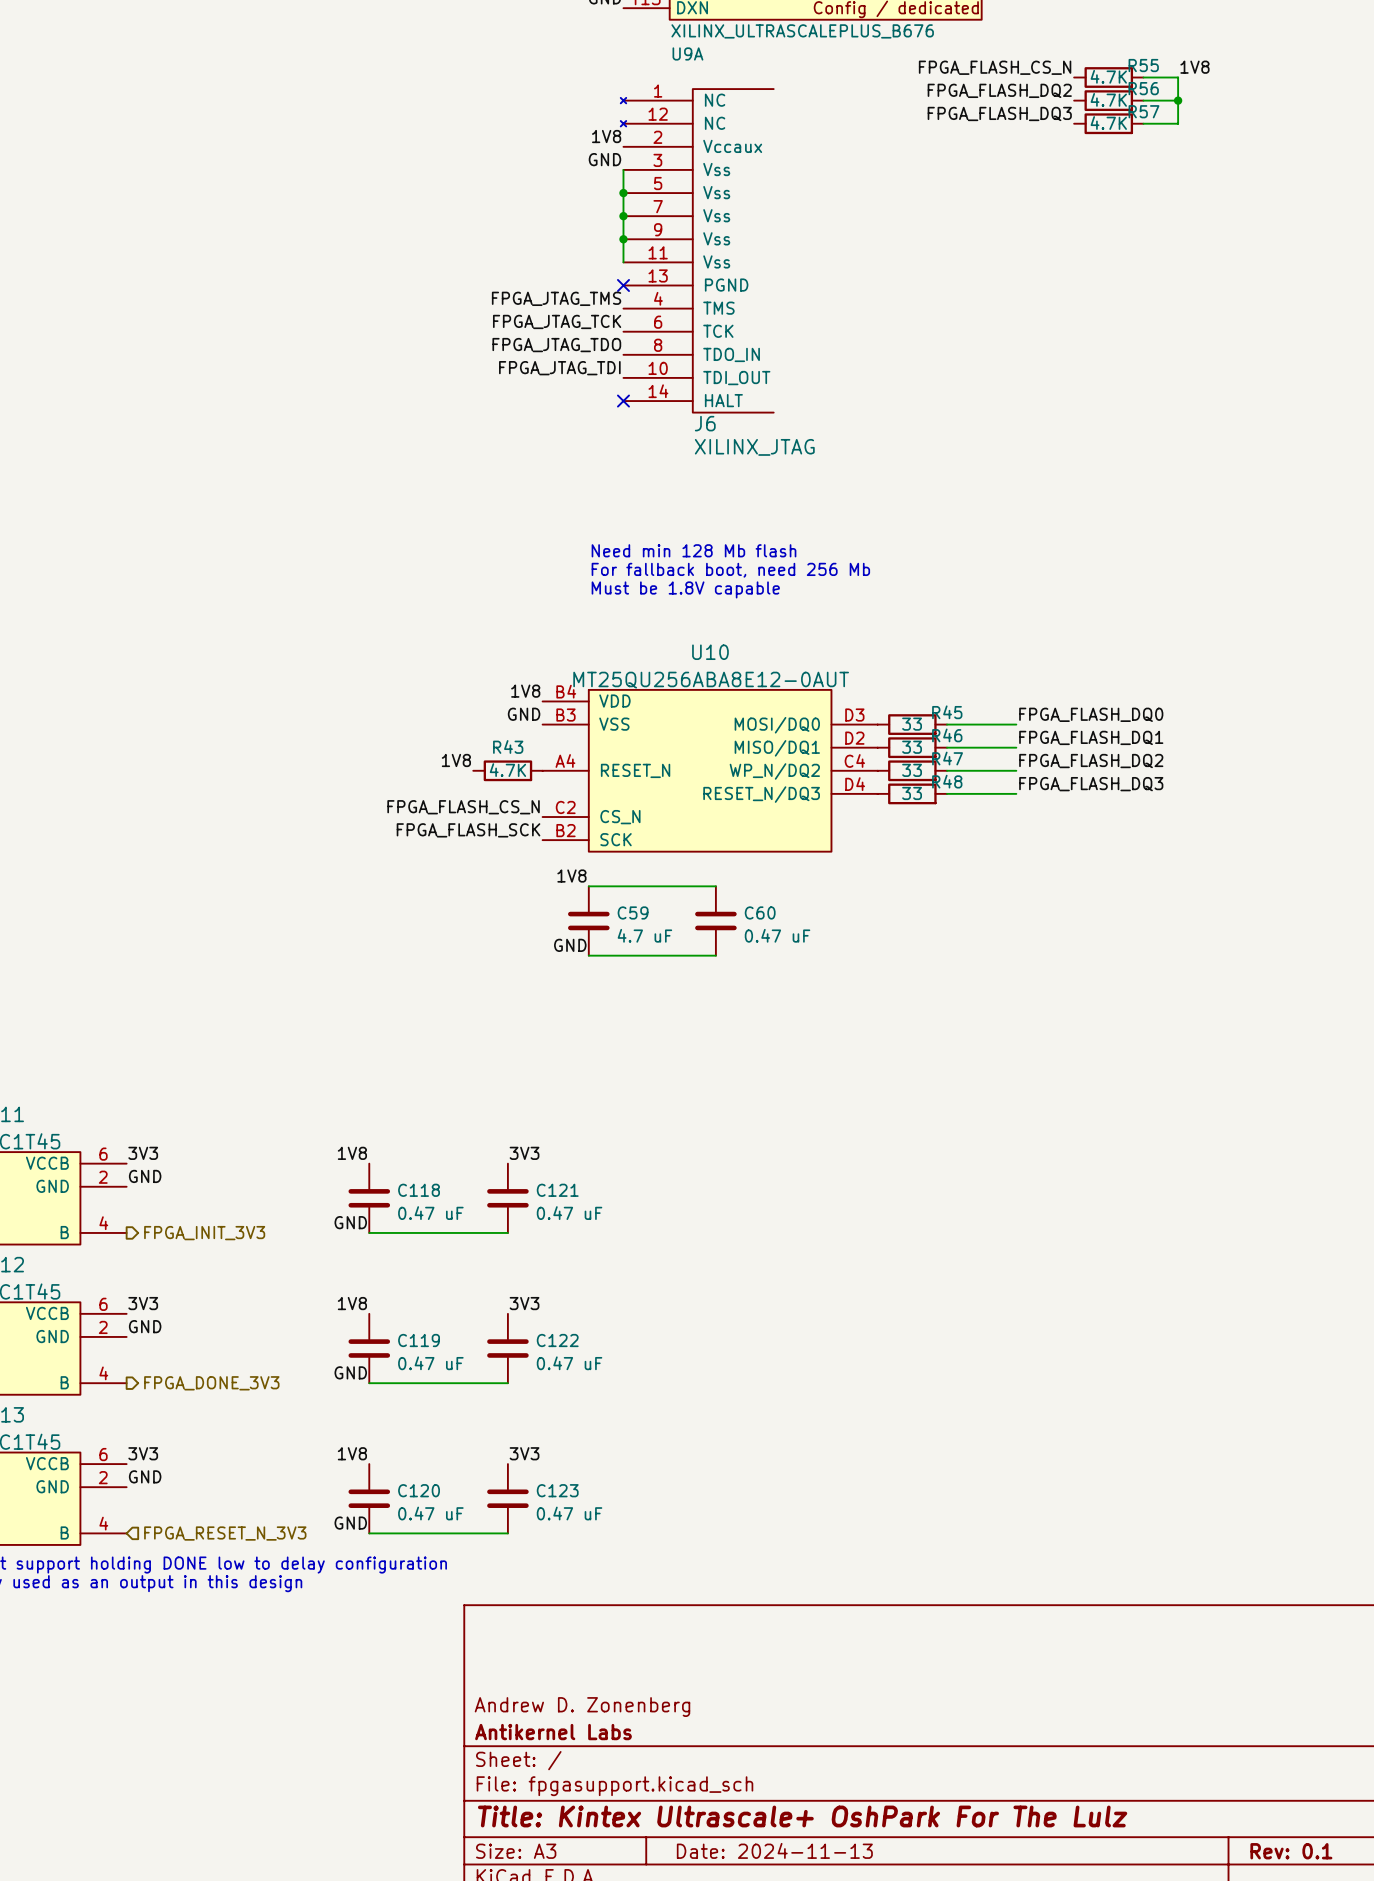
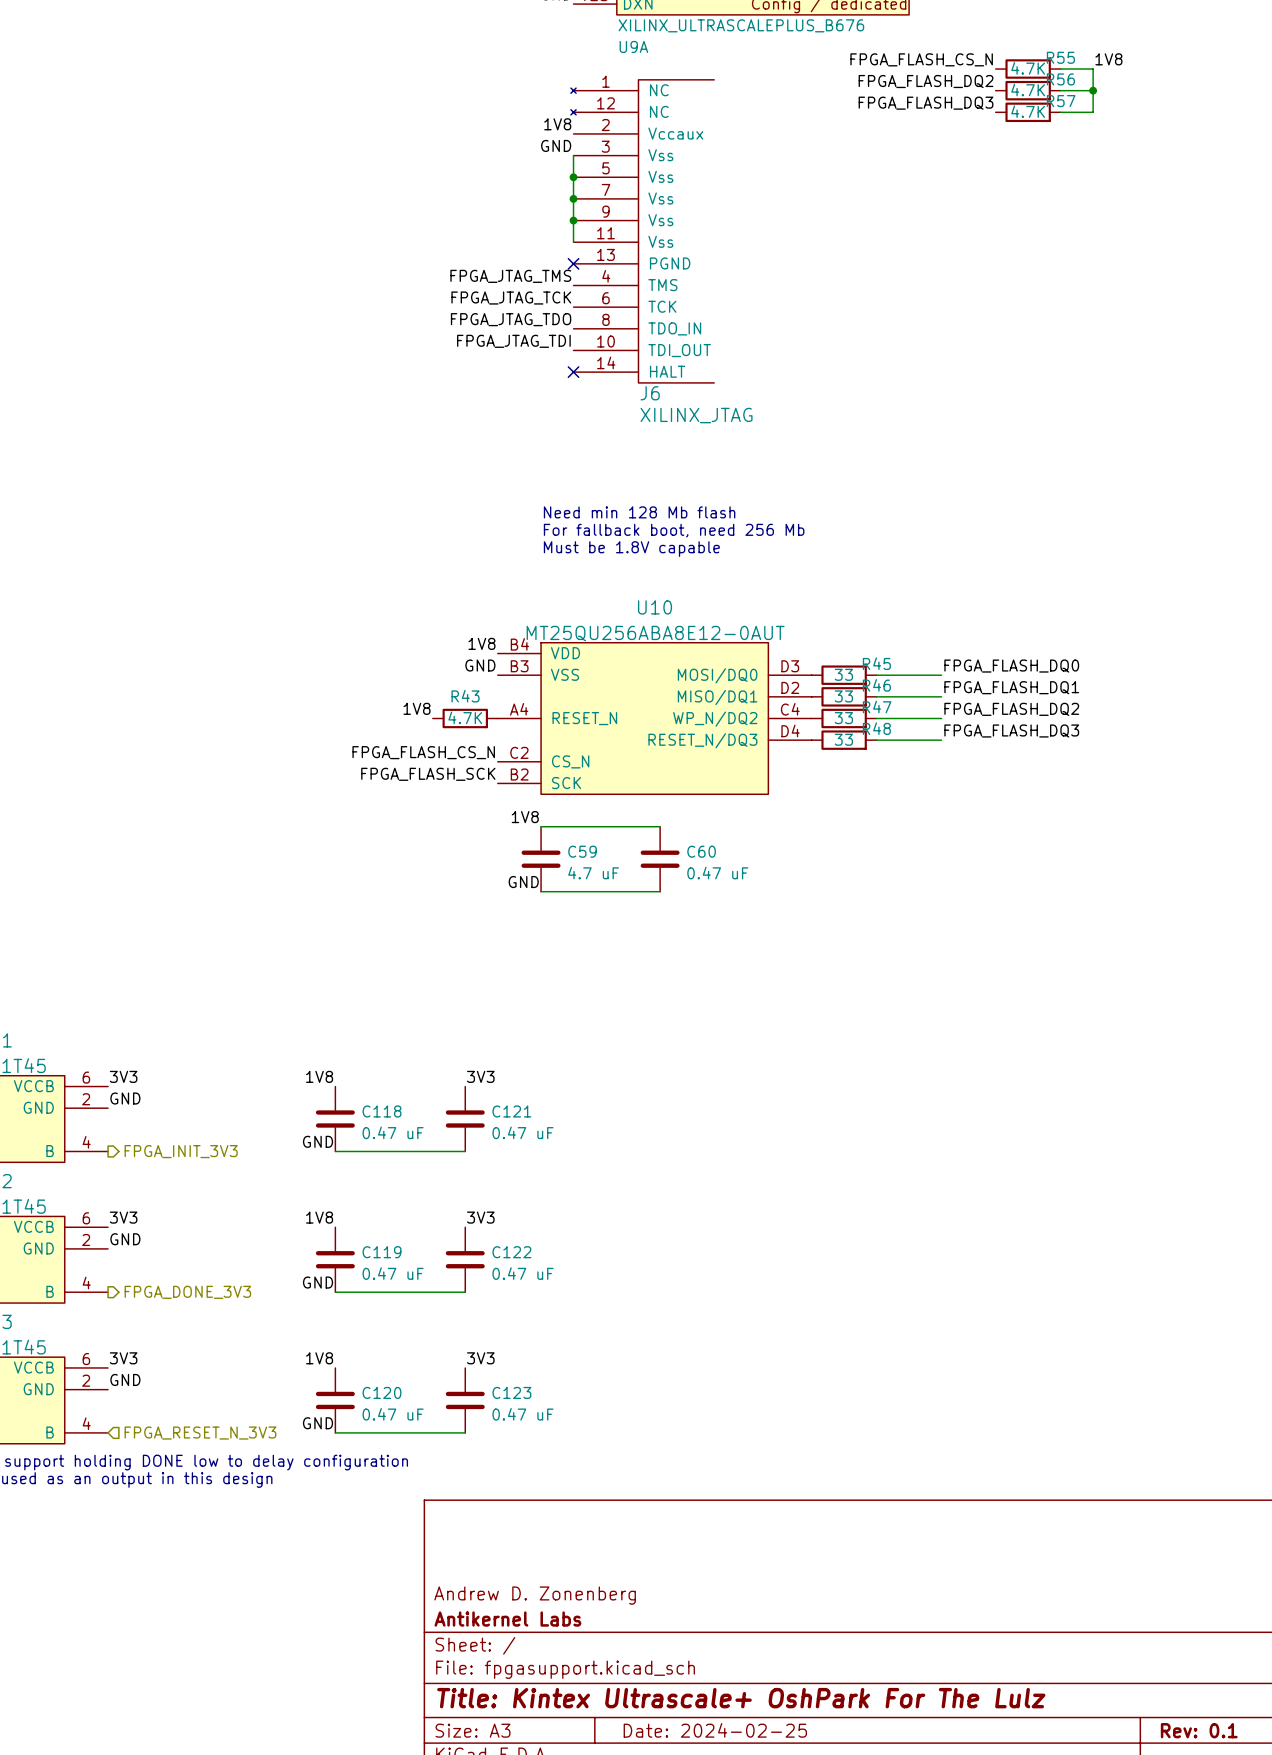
title block: Date: 2024-11-13 (774, 1850) -> Date: 2024-02-25 (715, 1730)

